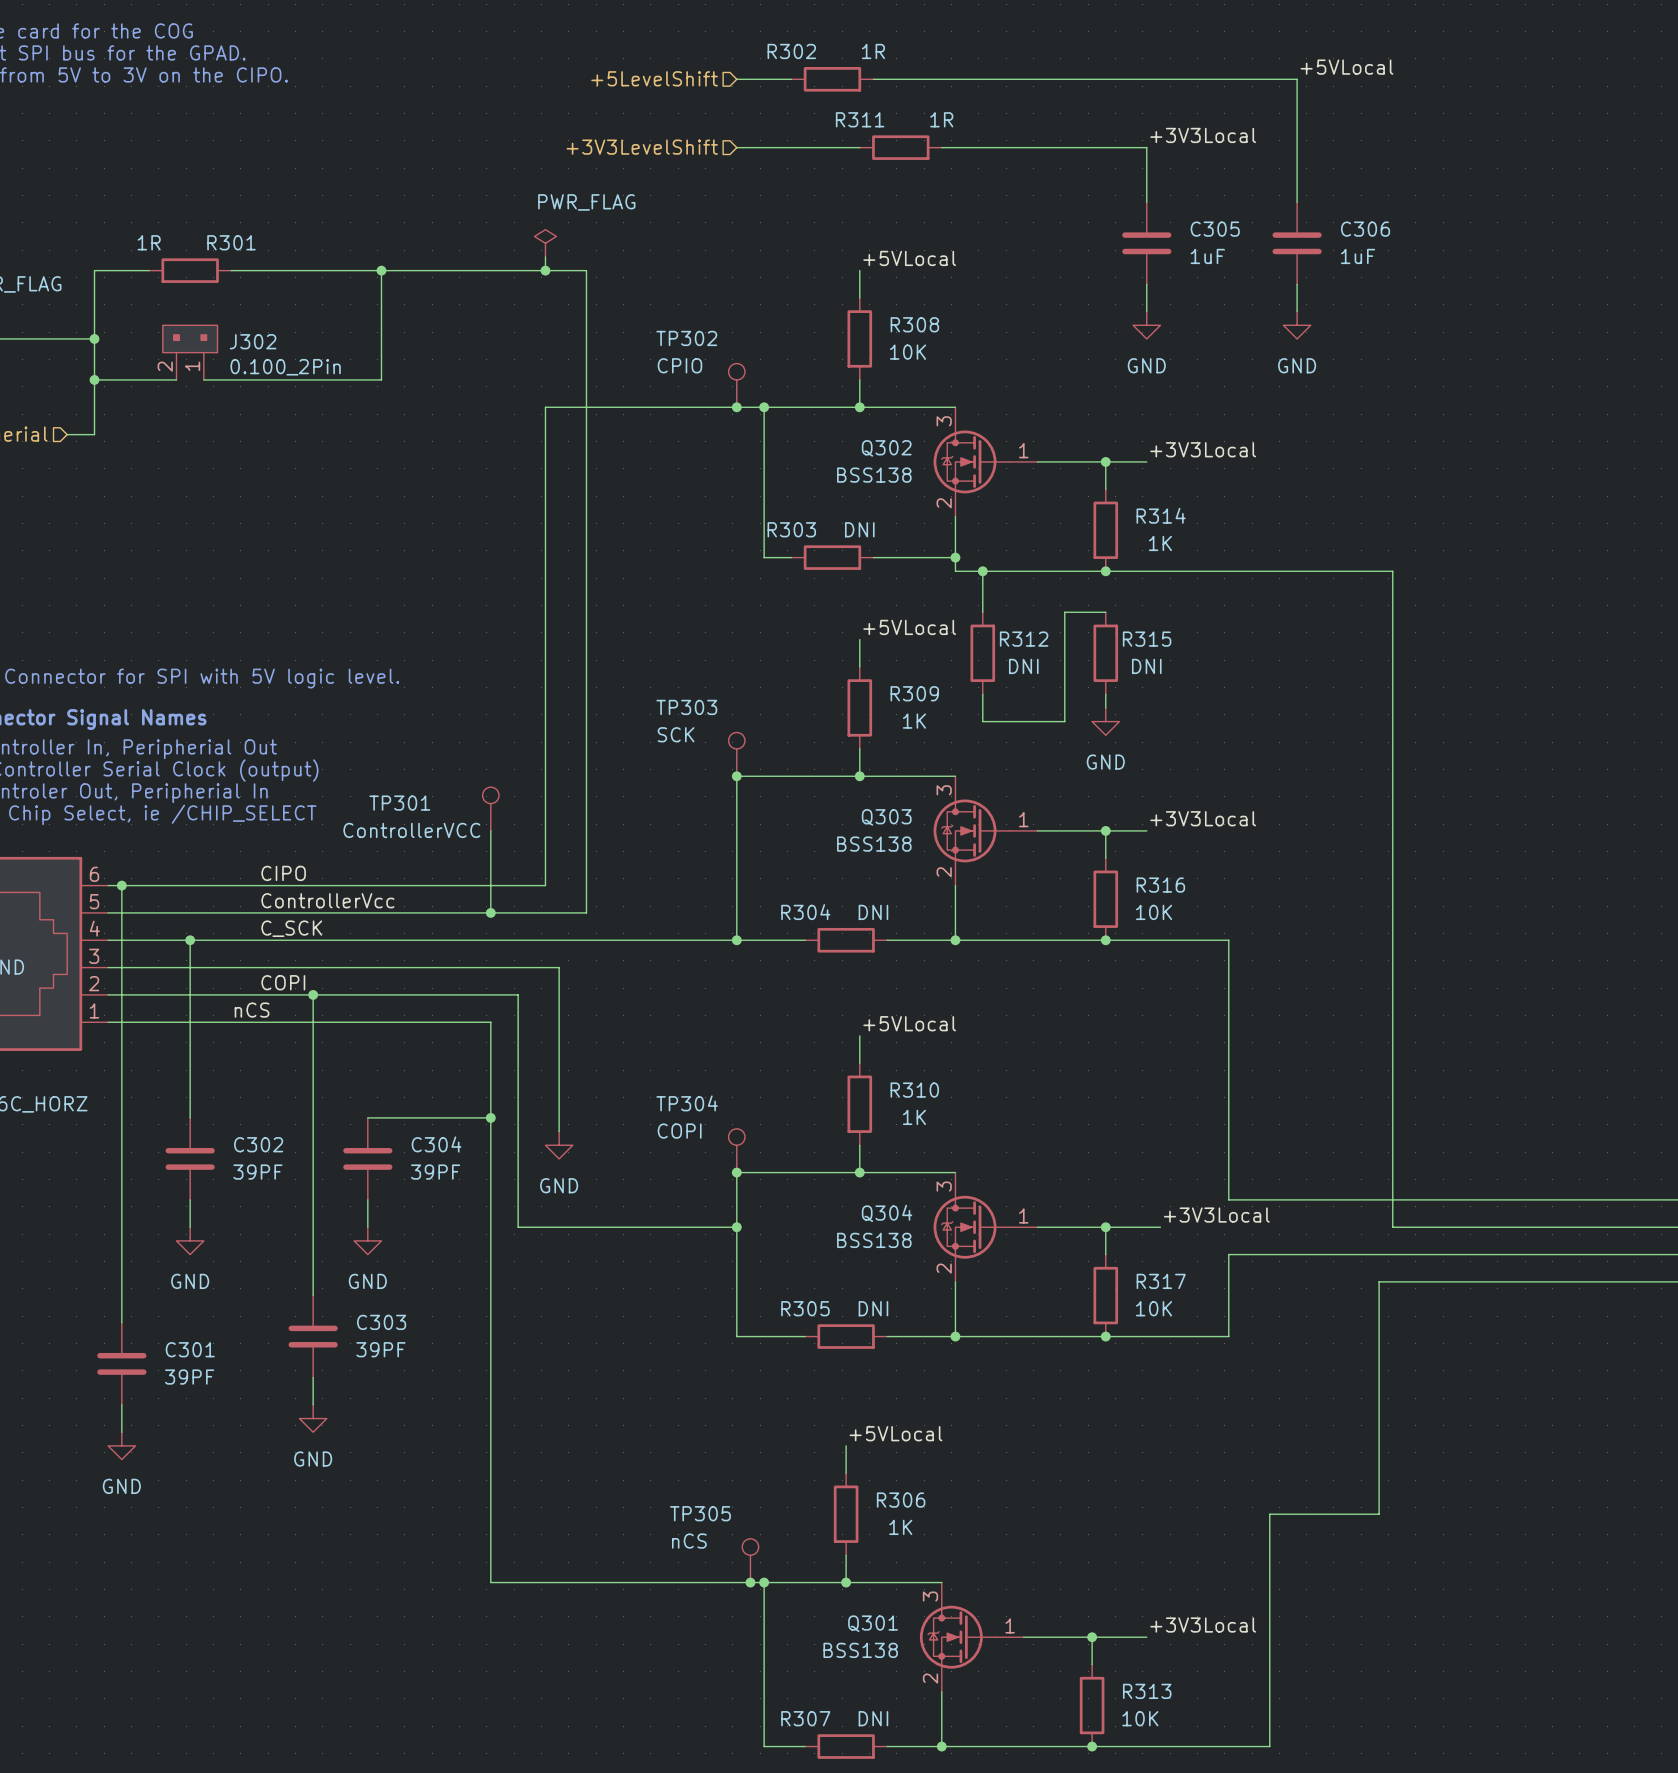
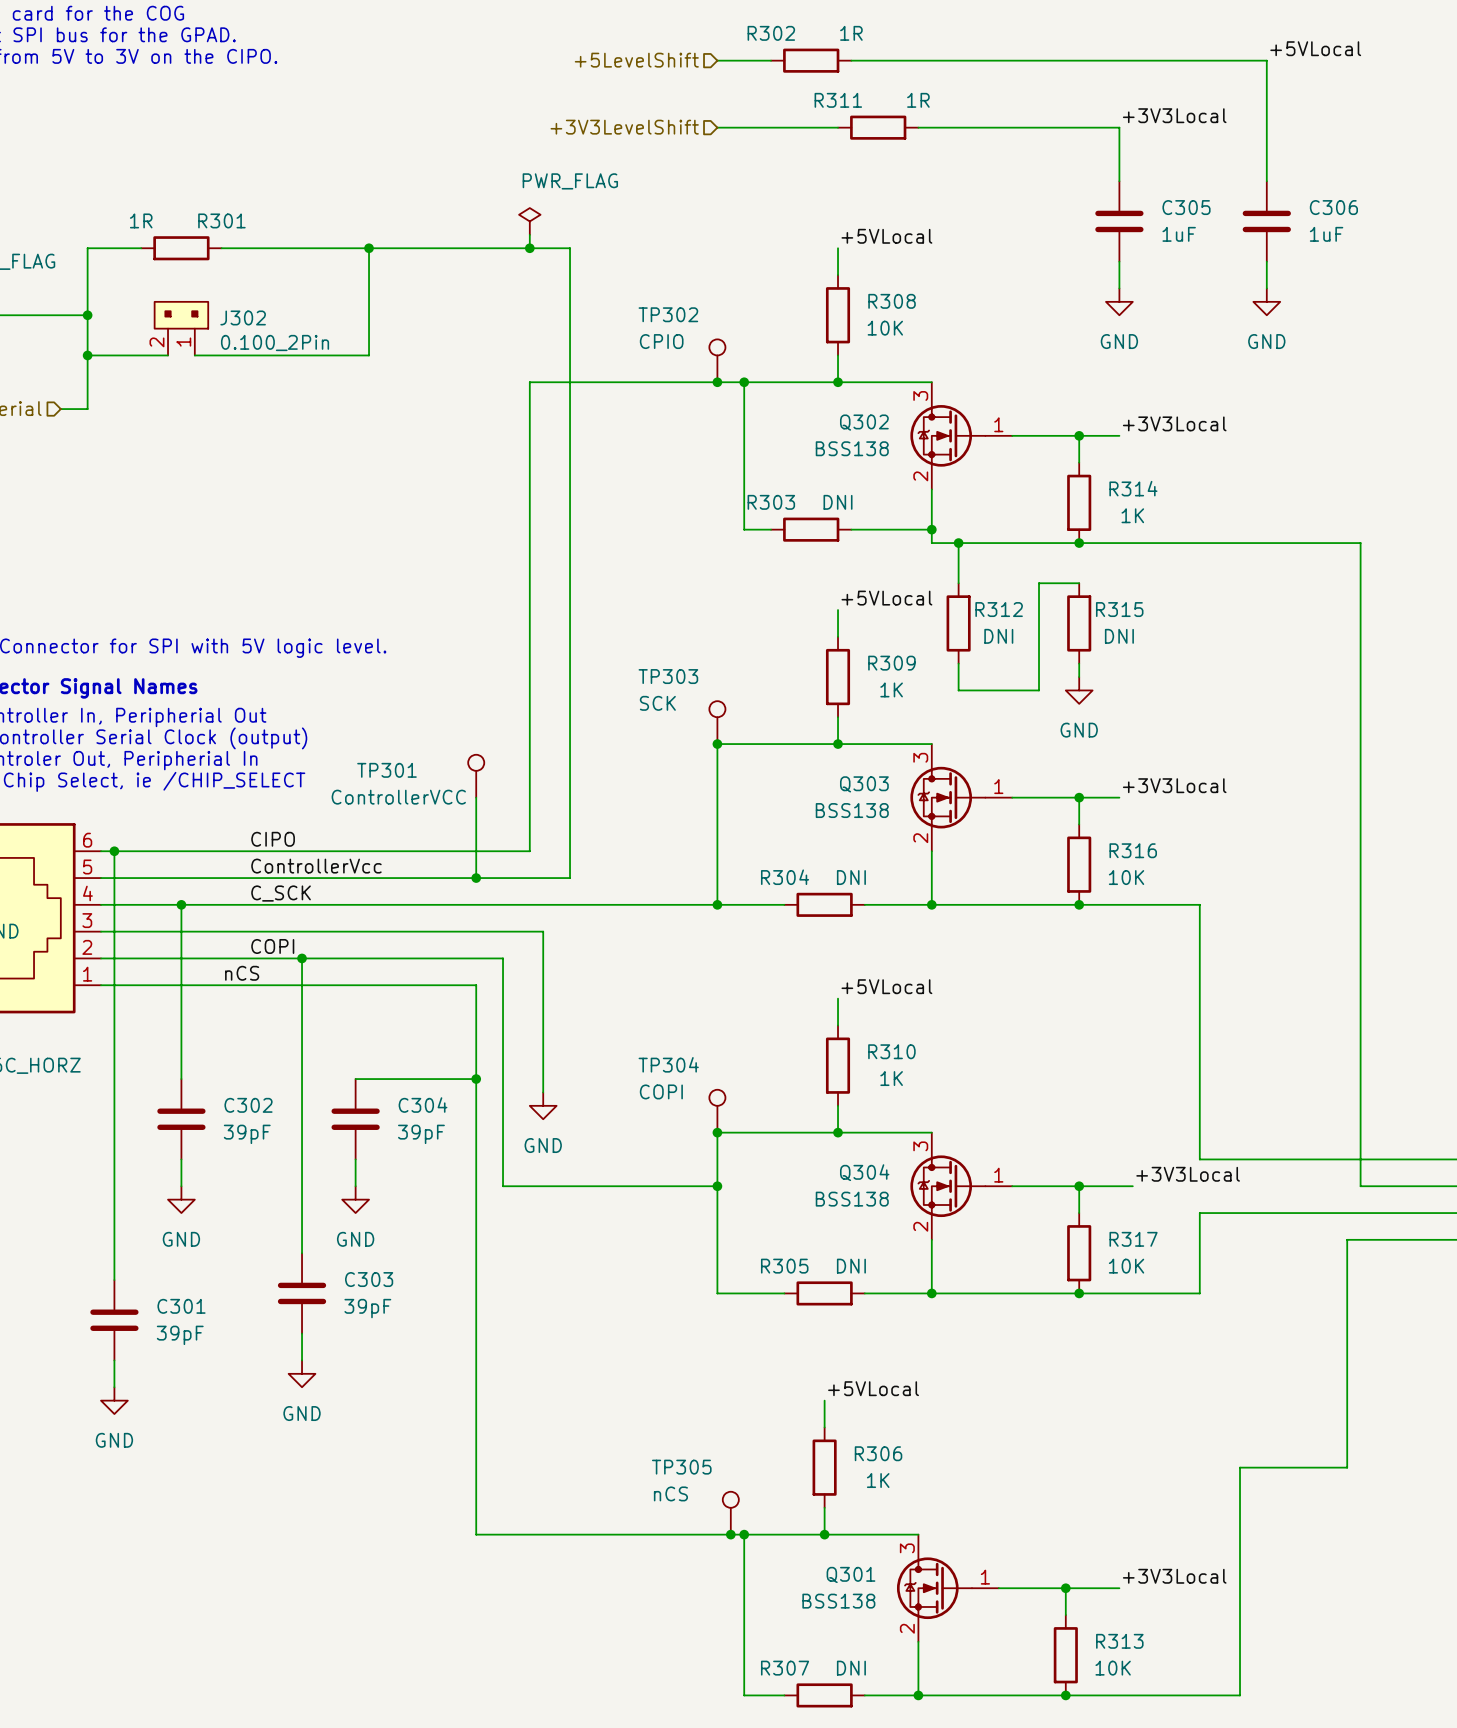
C302 value: 39PF (257, 1172) -> 39pF (247, 1134)
C304 value: 39PF (435, 1172) -> 39pF (421, 1134)
C303 value: 39PF (380, 1349) -> 39pF (367, 1308)
C301 value: 39PF (189, 1377) -> 39pF (180, 1335)

